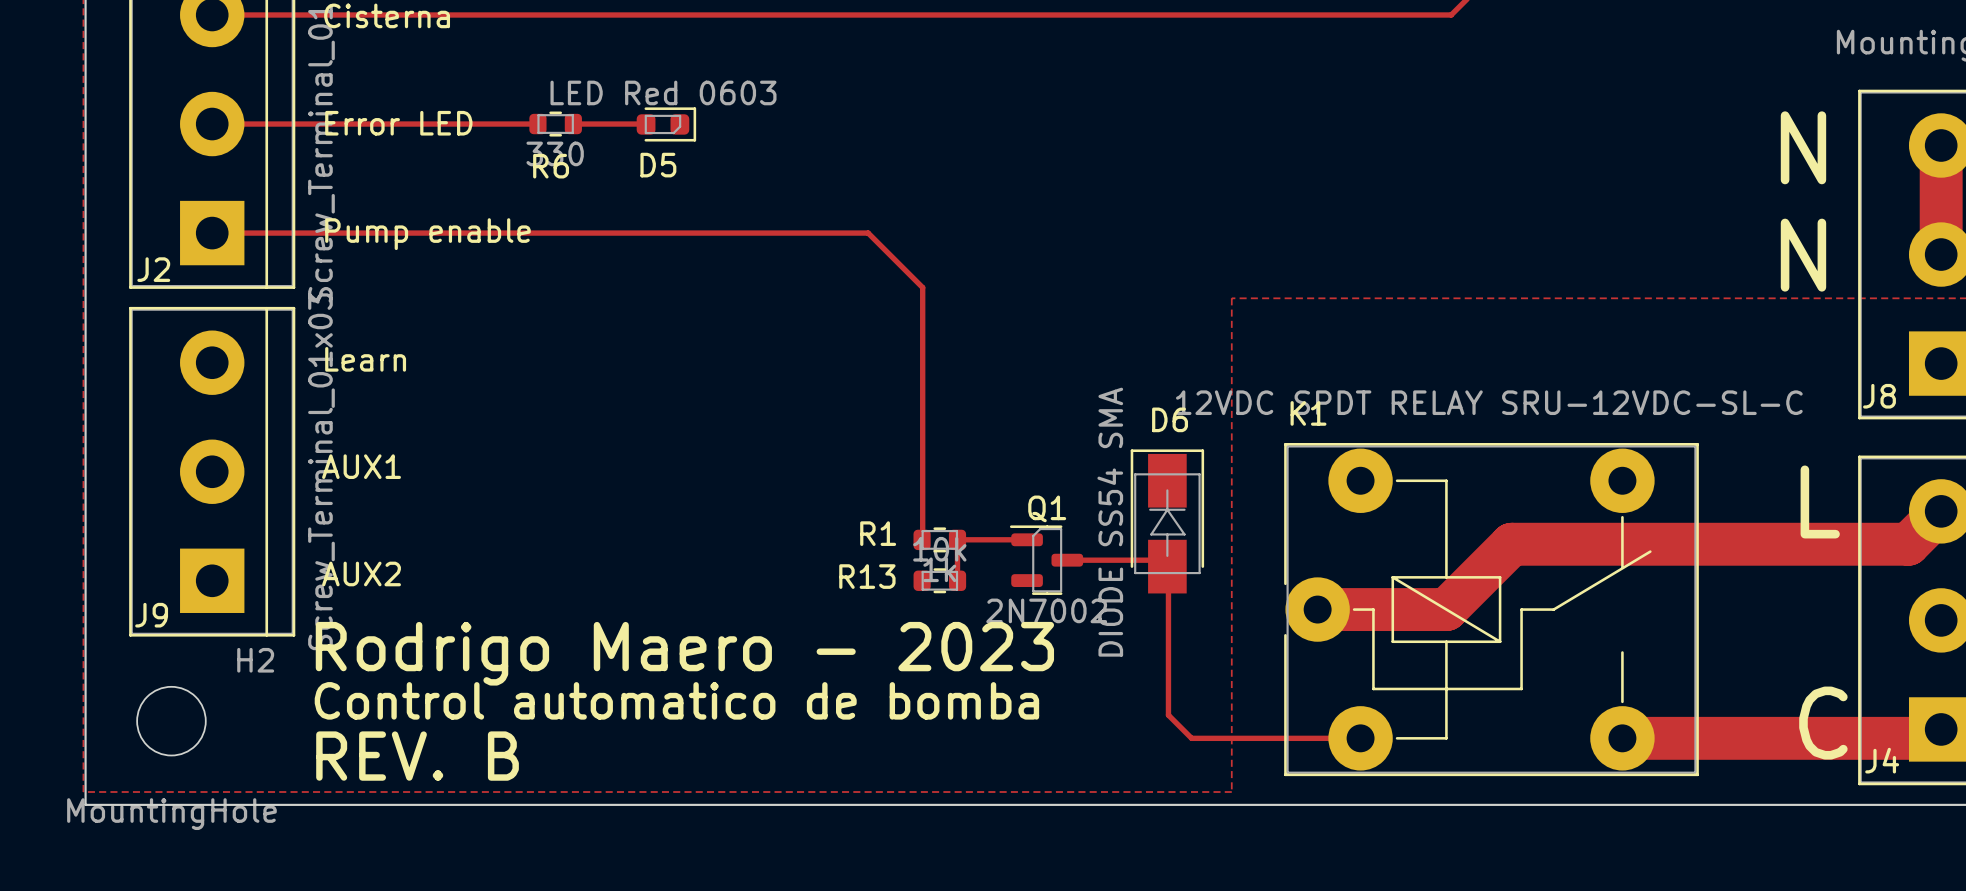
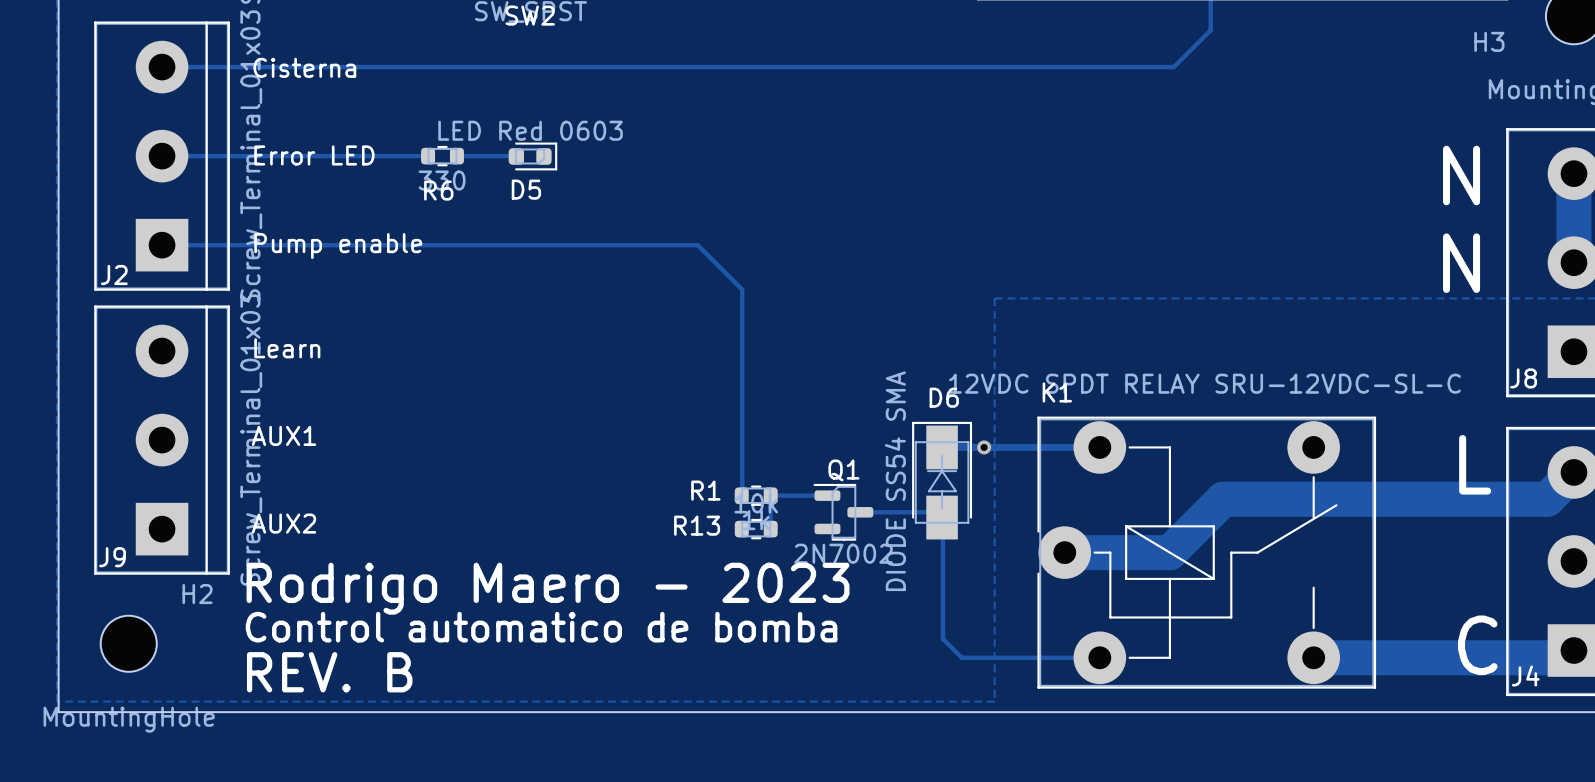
track: none -> (942, 447) (1099, 447)
via: none -> (984, 447)

